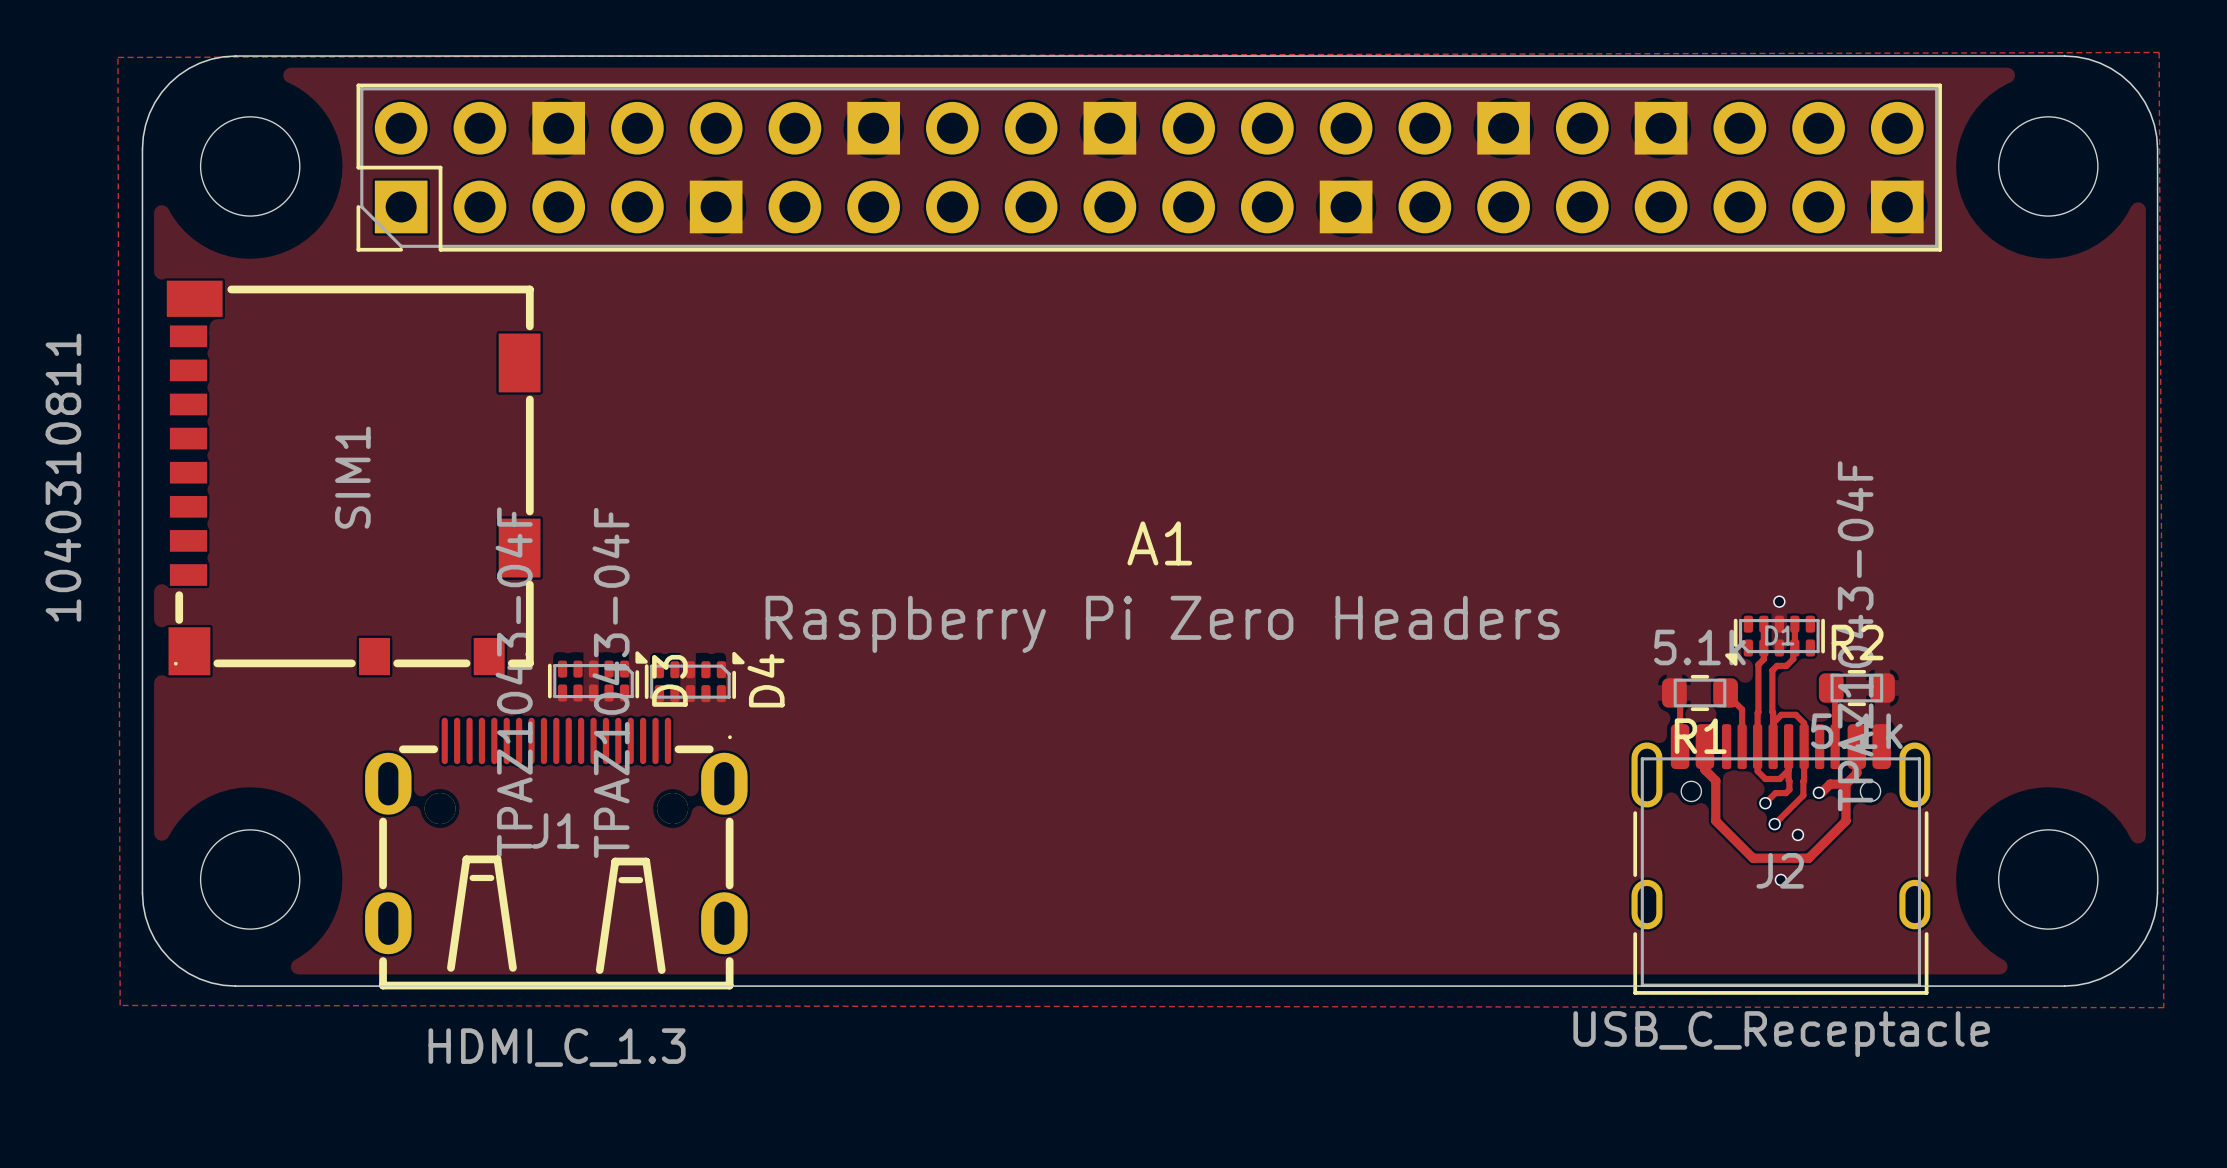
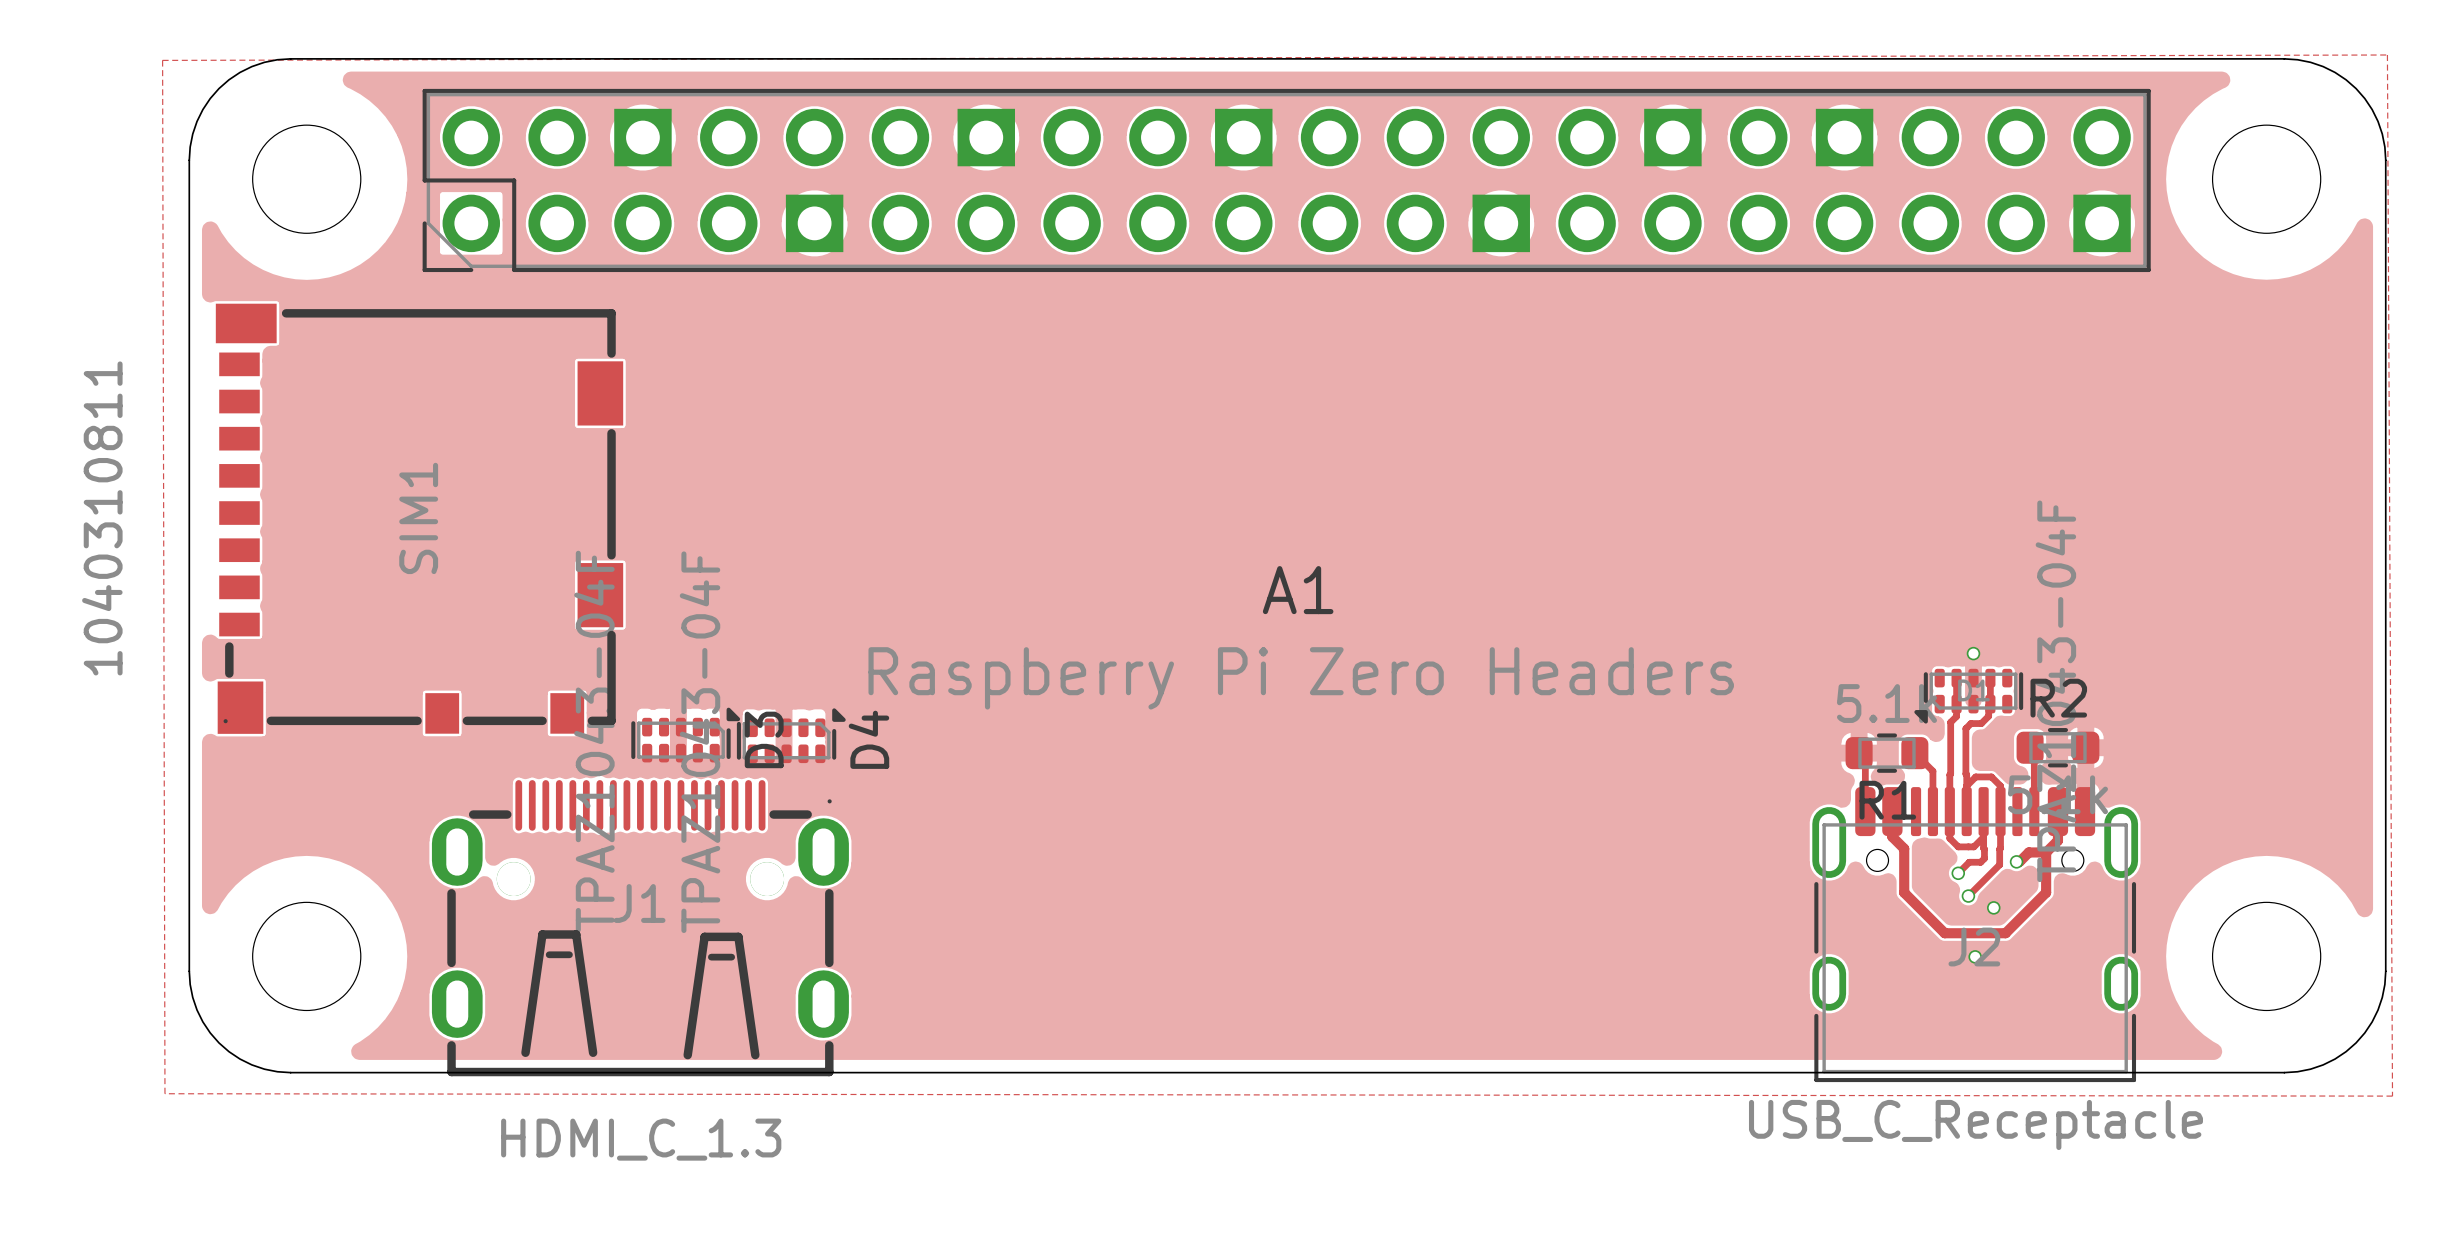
A1 footprint: [200, 83, 2098, 930] -> [252, 88, 2321, 1011]

